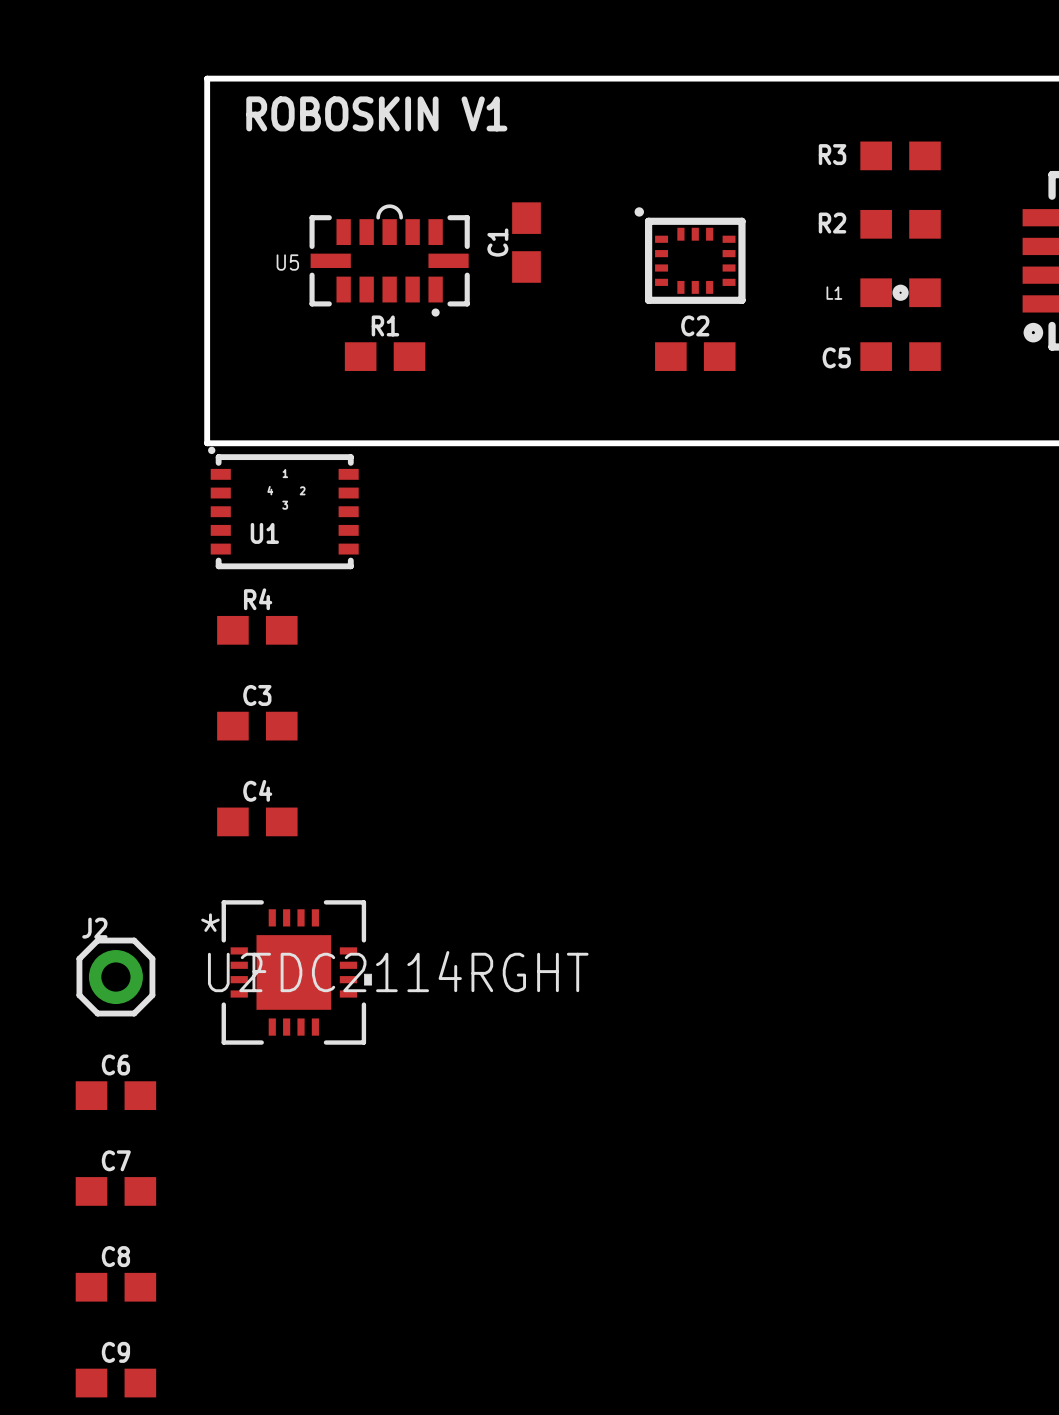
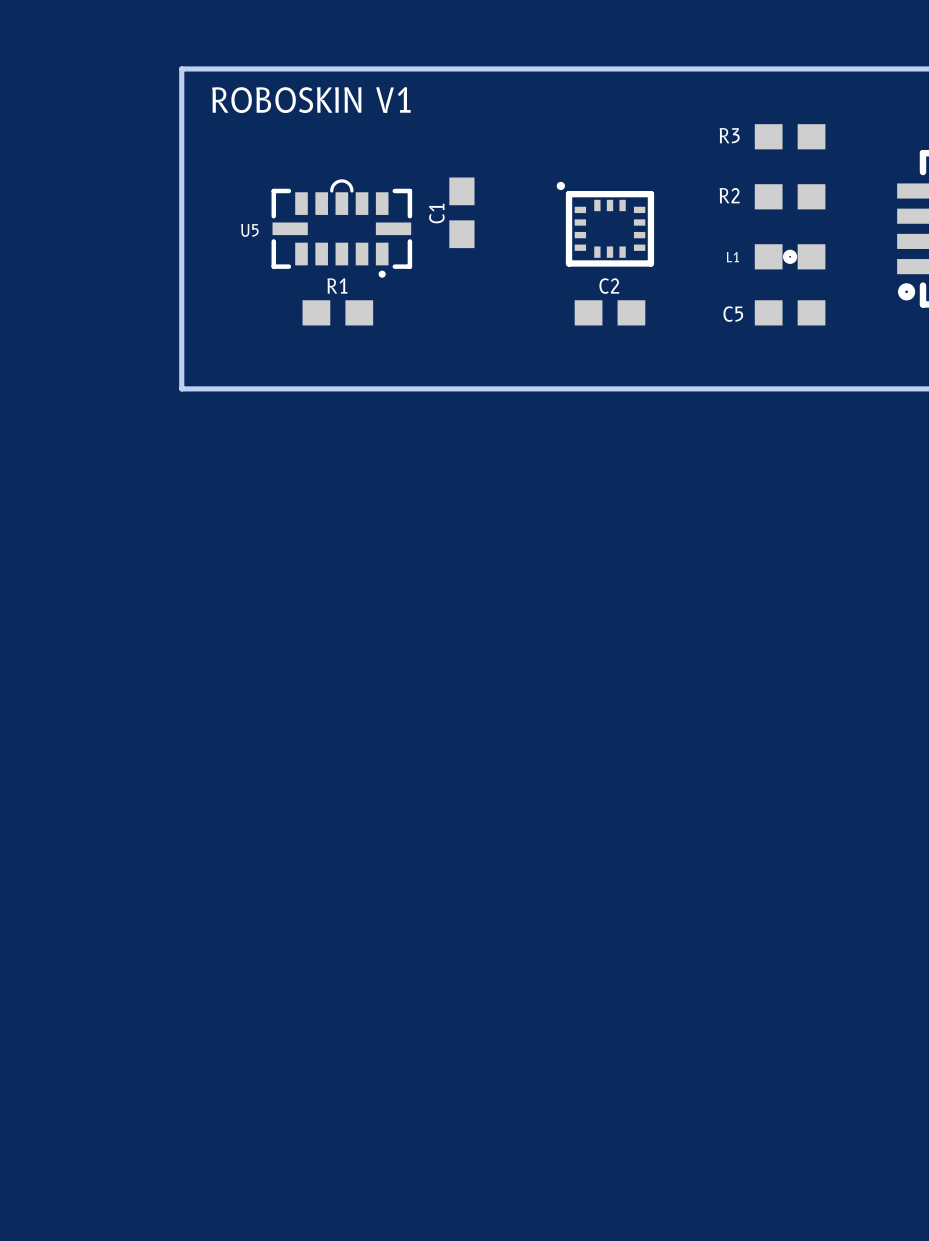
U1: (283, 507) -> none
R4: (257, 630) -> none
C3: (257, 726) -> none
C4: (257, 821) -> none
U2: FDC2114RGHT (296, 972) -> none
J2: (115, 977) -> none
C6: (115, 1095) -> none
C7: (115, 1191) -> none
C8: (115, 1287) -> none
C9: (115, 1383) -> none

